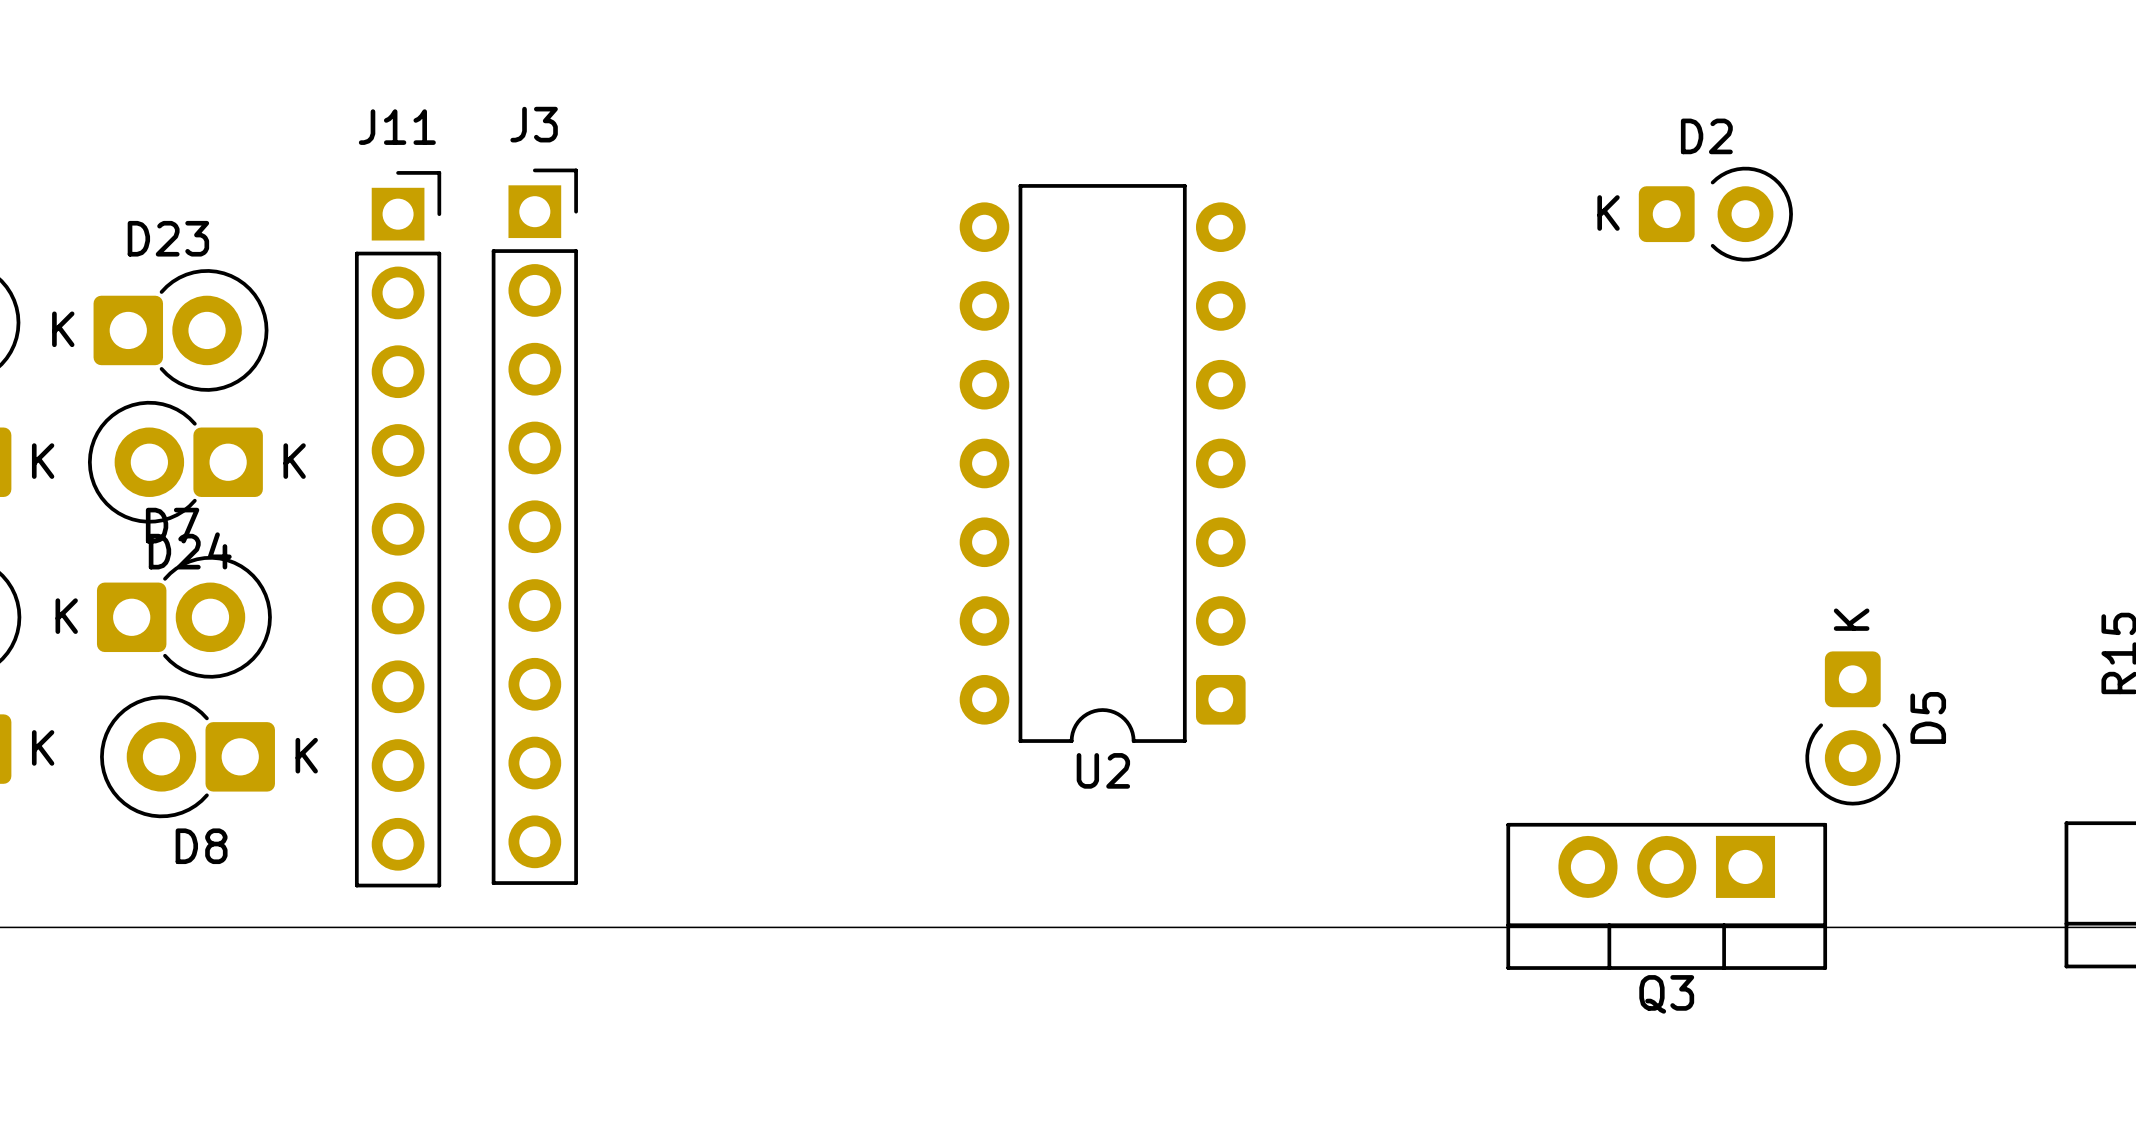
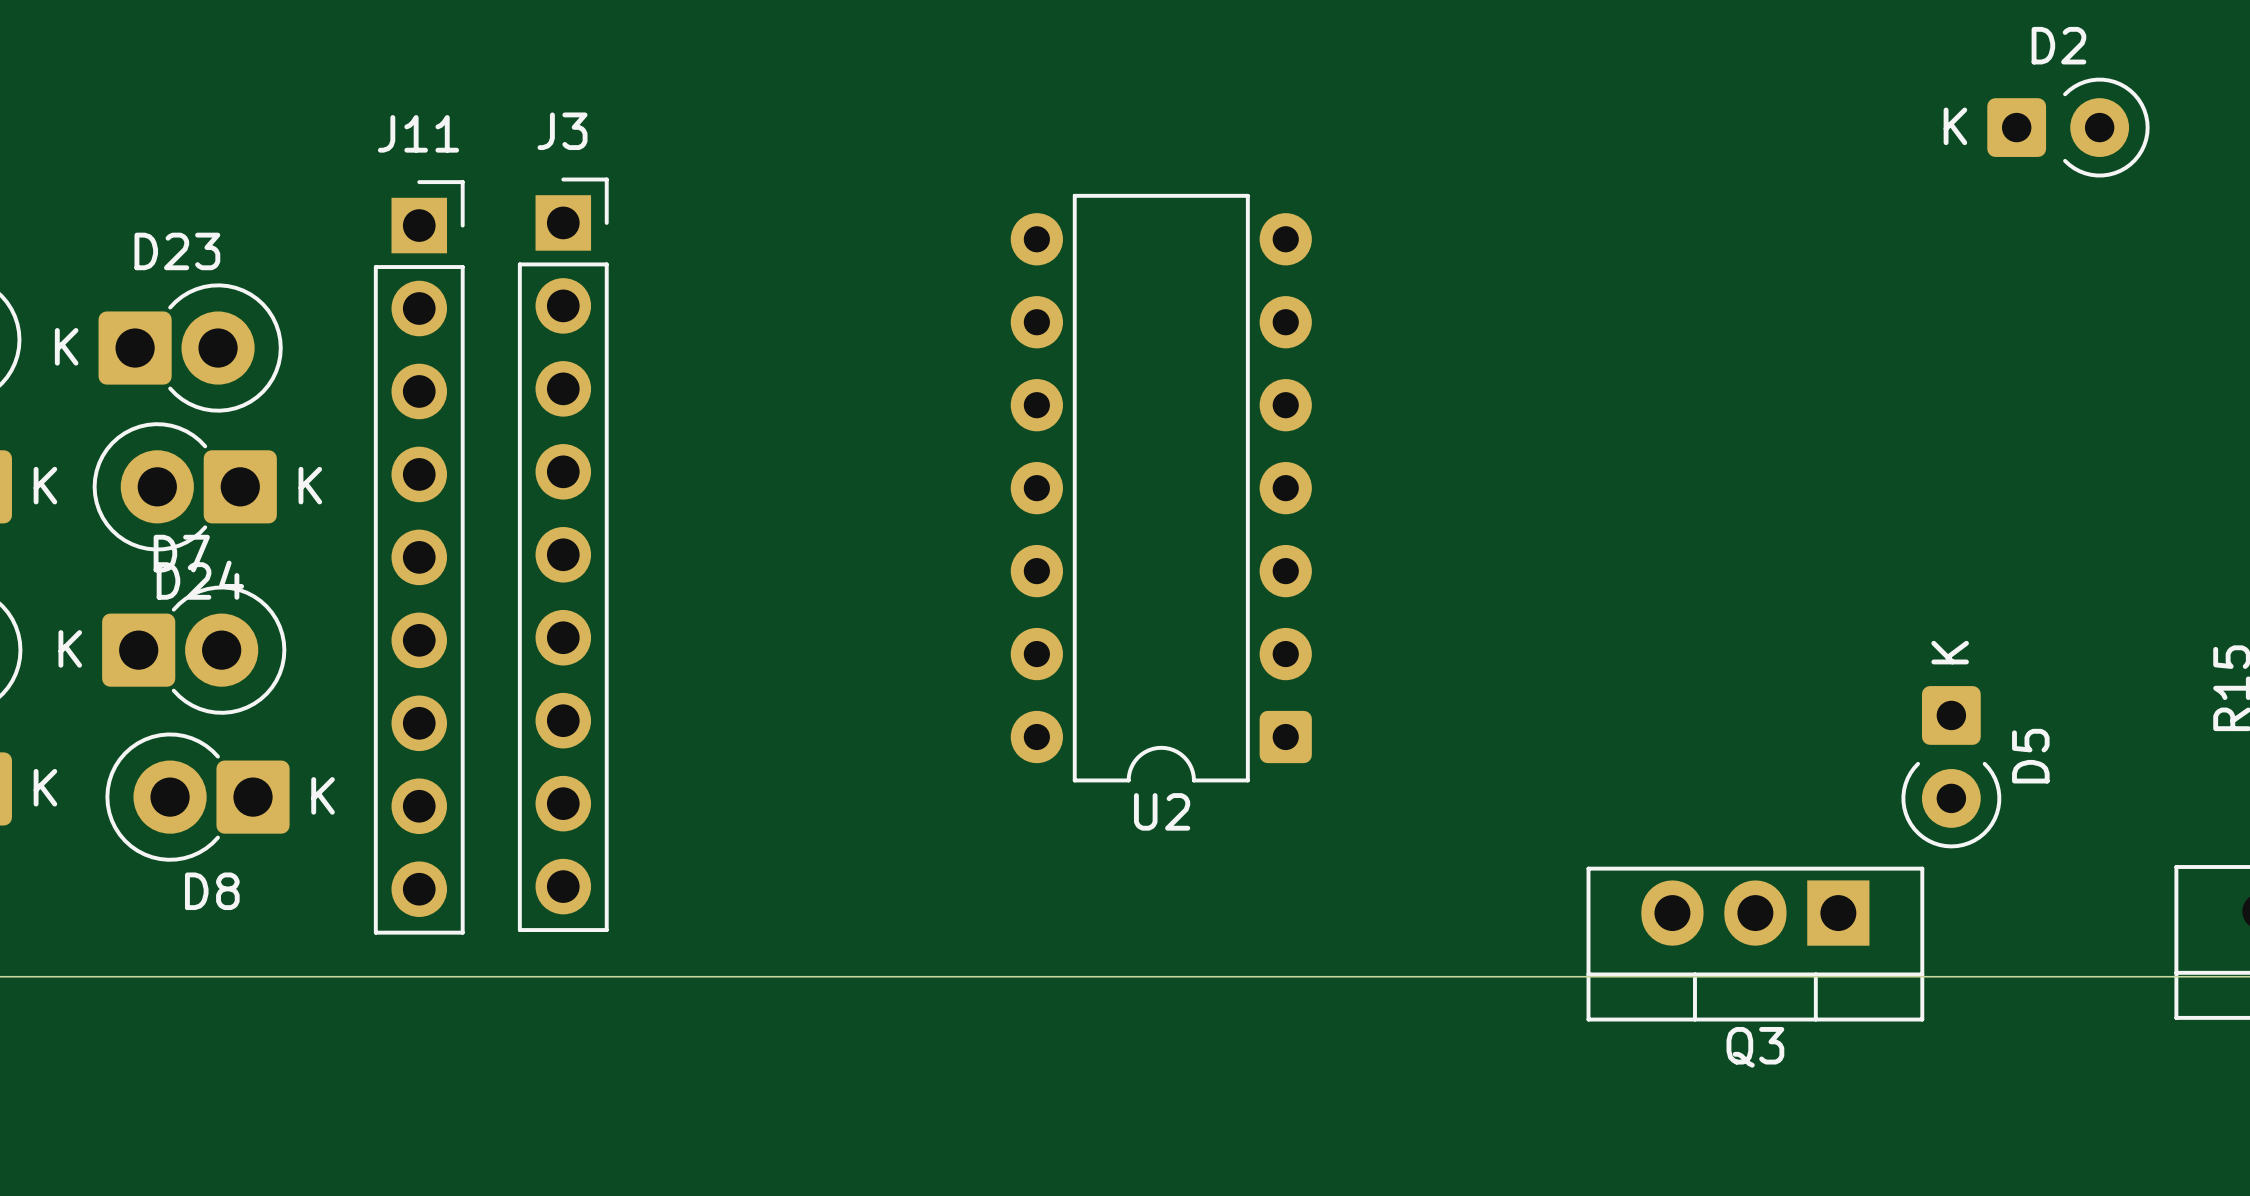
D2 position: (1715, 214) -> (2068, 127)

